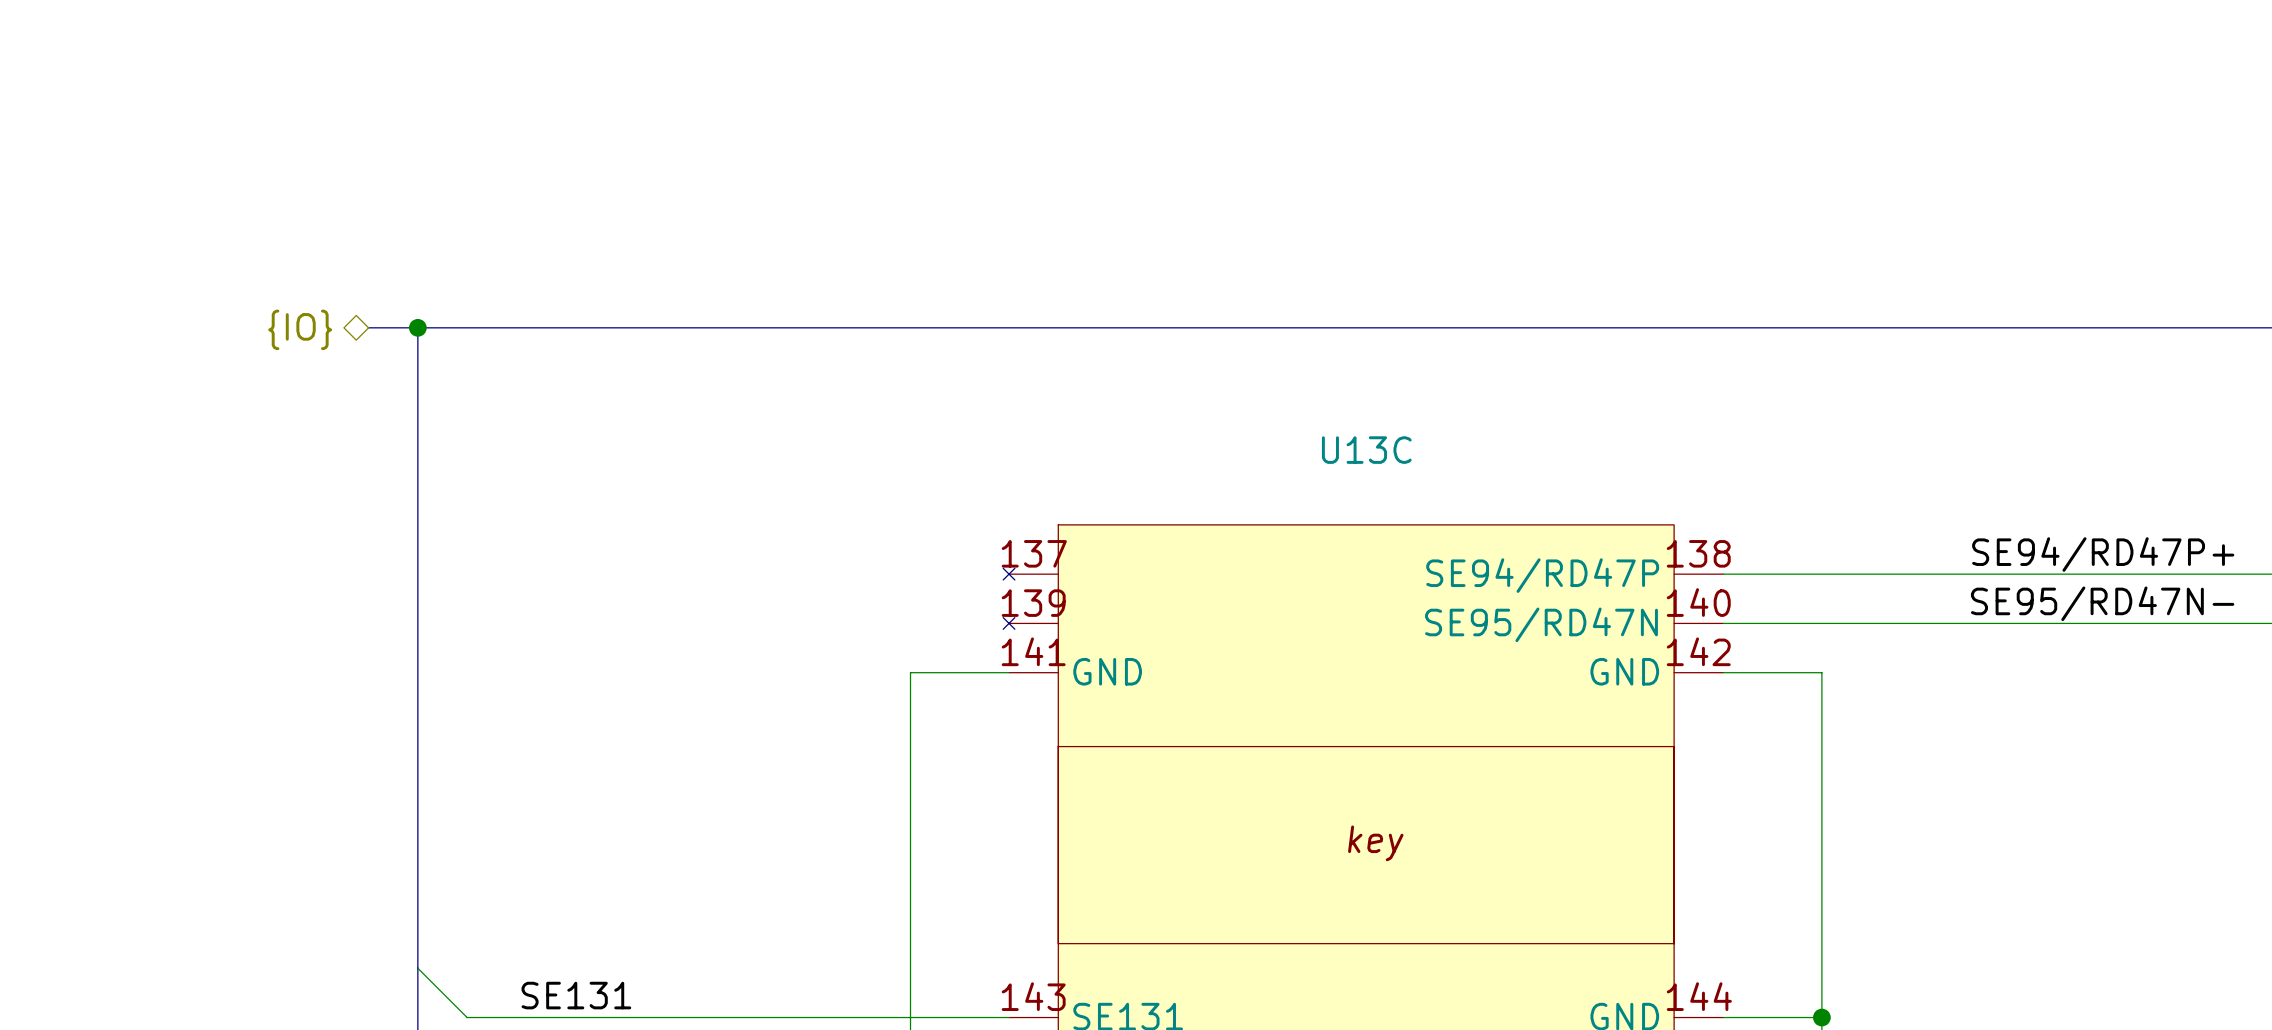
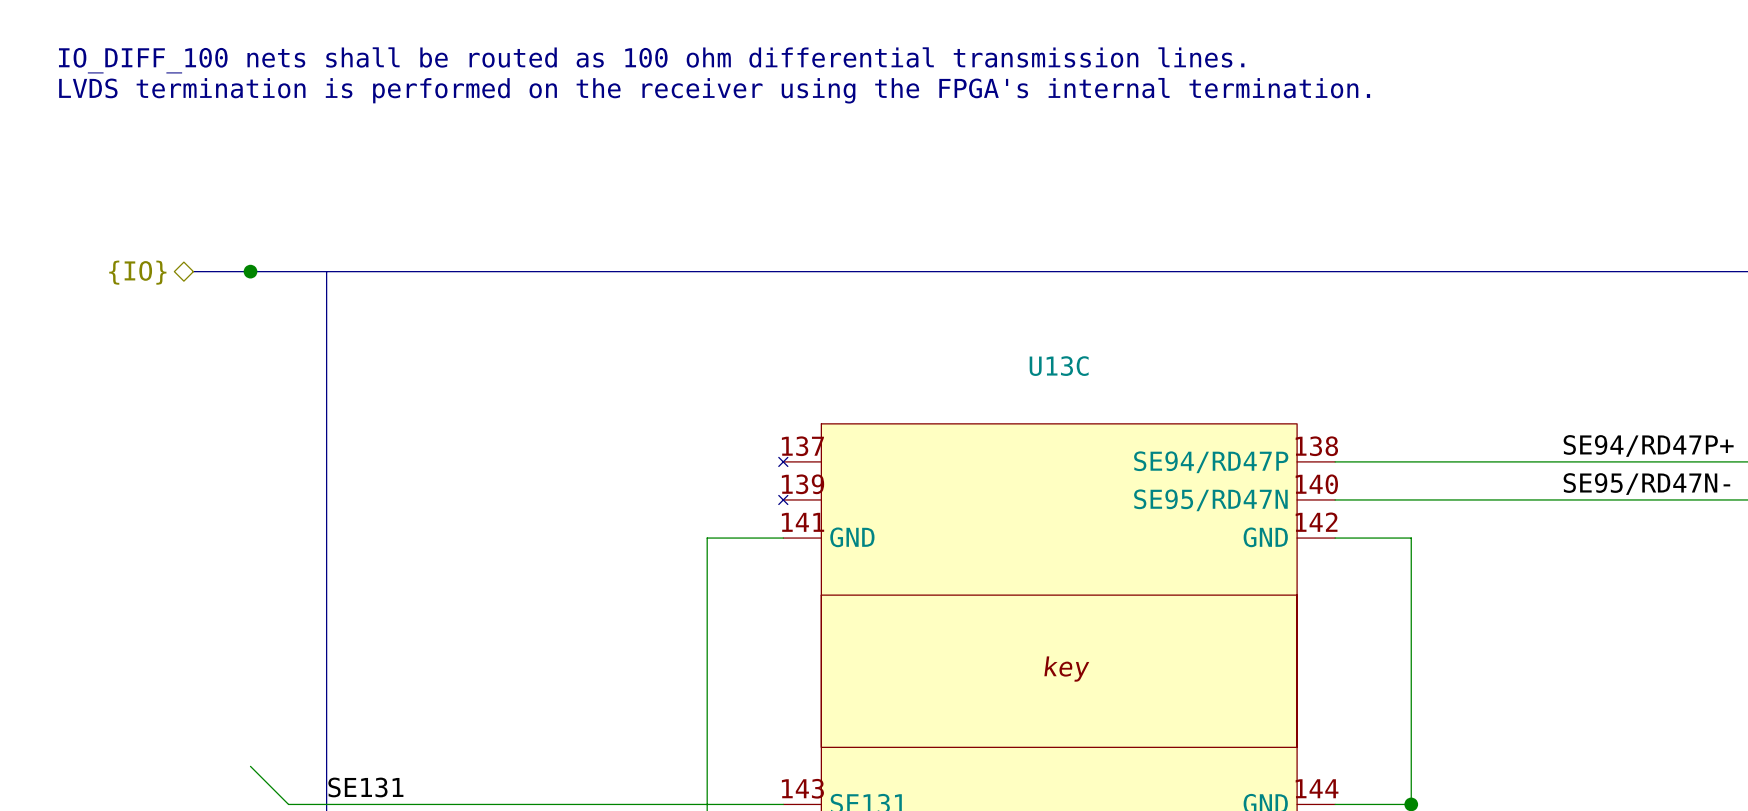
text: none -> IO_DIFF_100 nets shall be routed as 100 ohm differential transmission lines. (651, 60)
text: none -> LVDS termination is performed on the receiver using the FPGA's internal termination. (714, 90)
bus: none -> (193, 271) (288, 271)
junction position: (417, 327) -> (250, 271)
hierarchical label position: {IO} (300, 329) -> {IO} (137, 272)
wire: (417, 968) (467, 1017) -> (250, 766) (288, 804) (364, 804)
label position: SE131 (576, 995) -> SE131 (365, 787)

